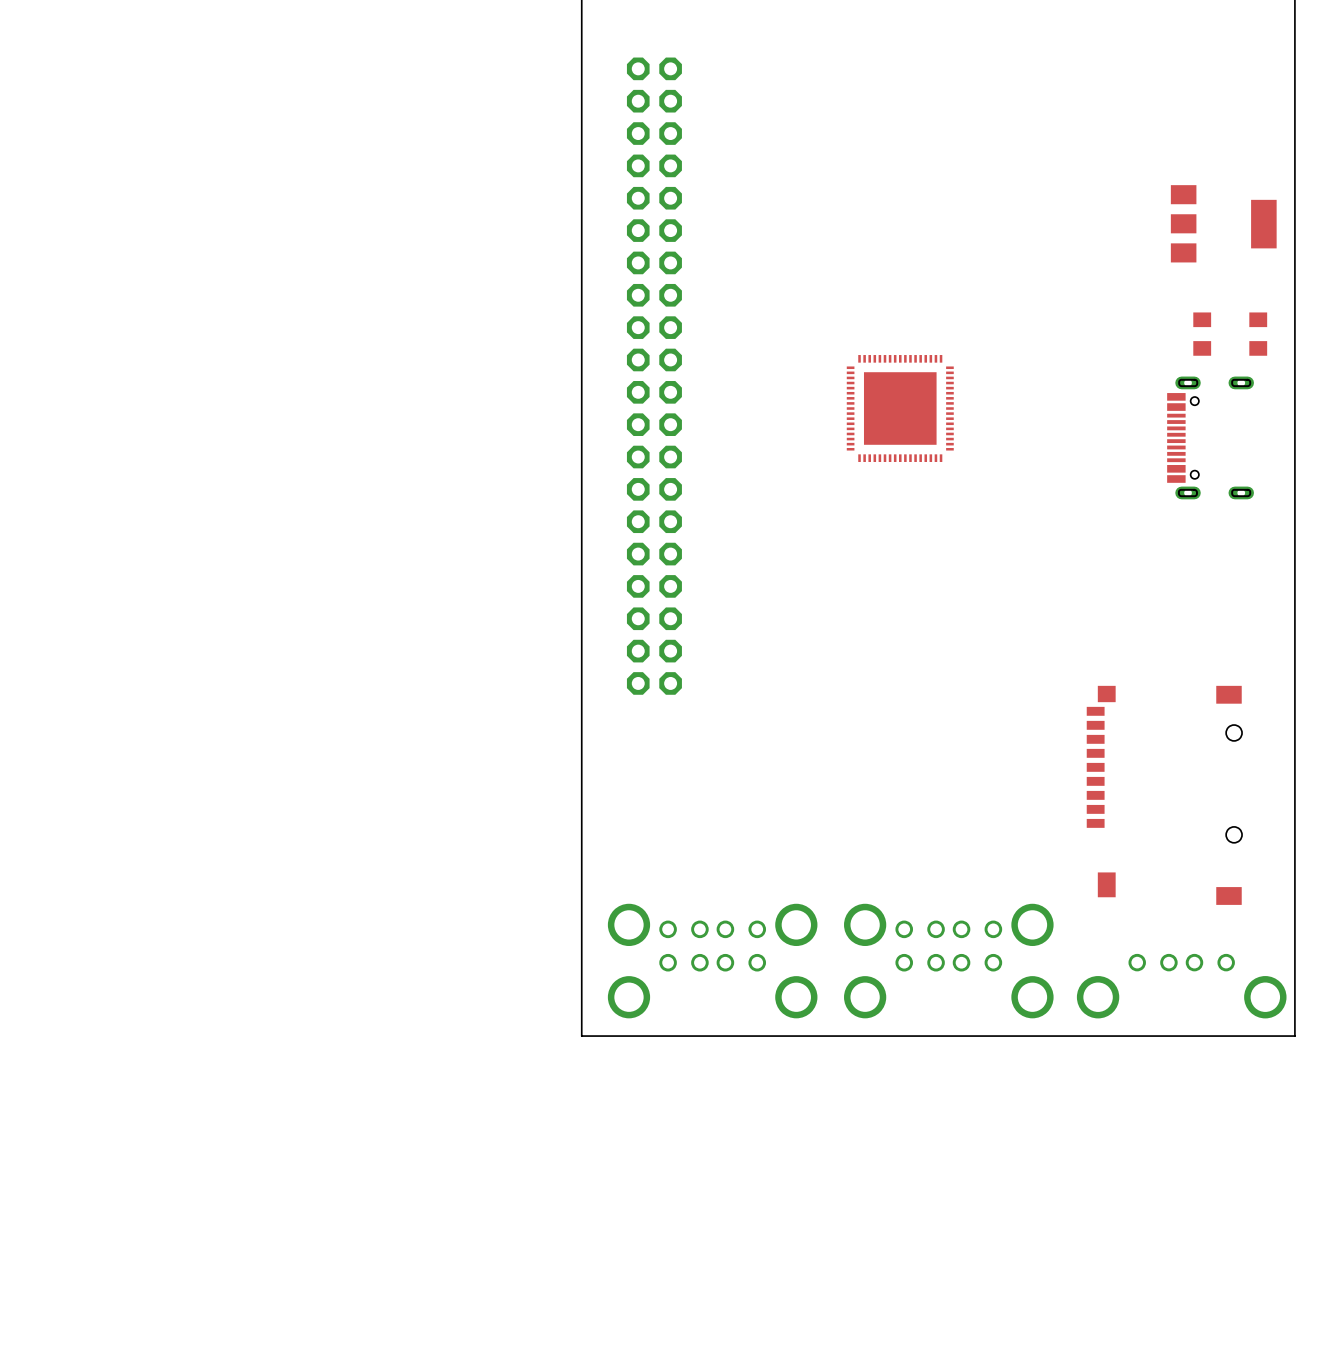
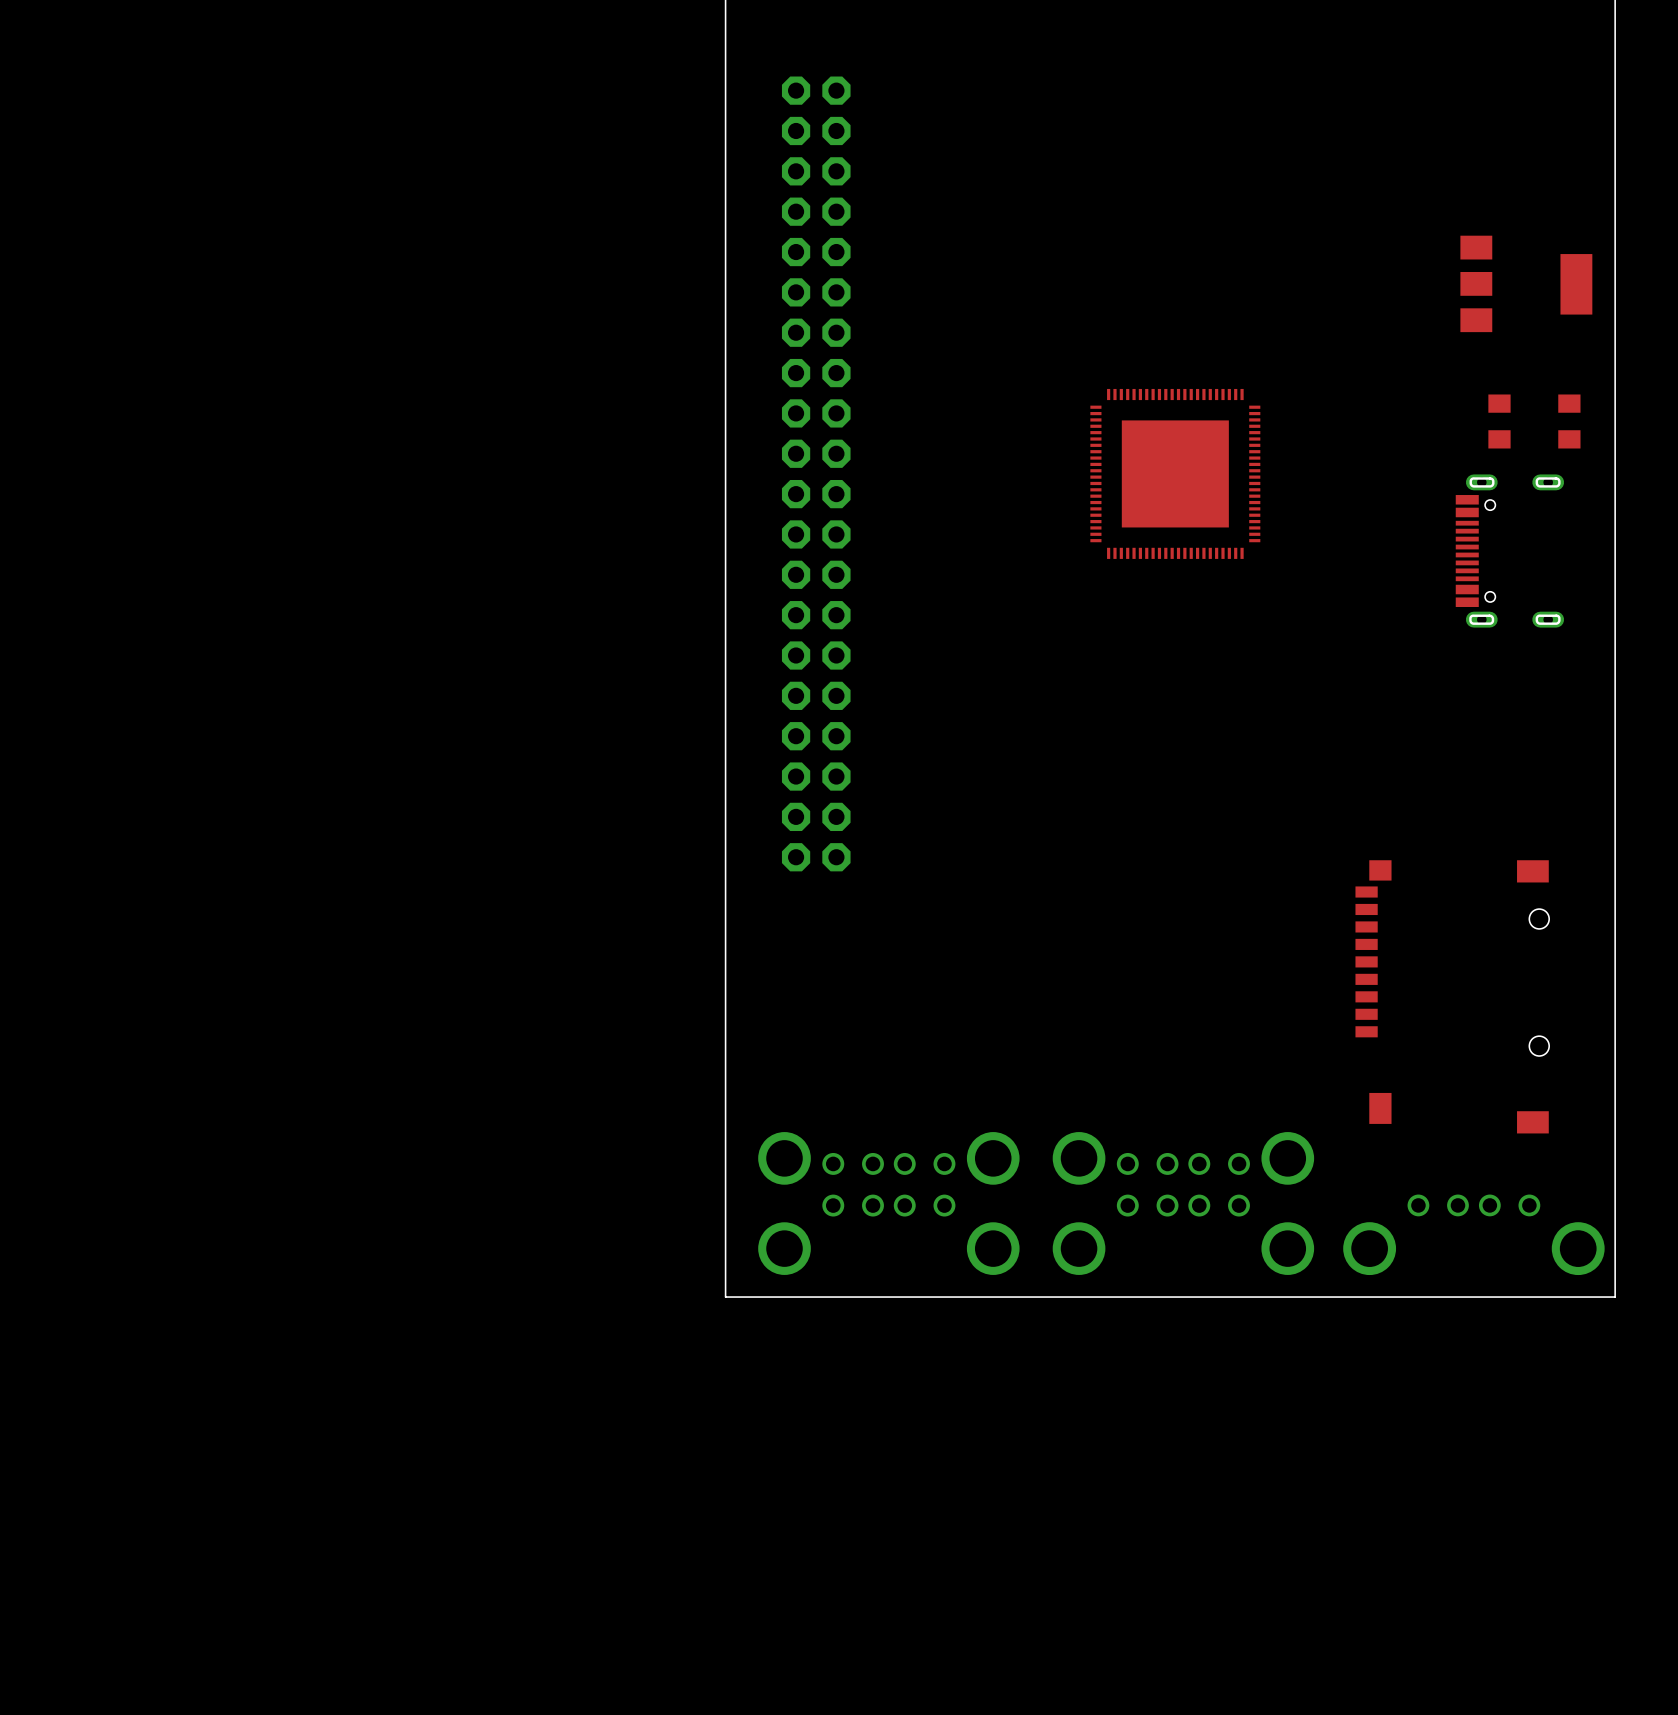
part: none -> (1175, 473)
part: (900, 408) -> none

